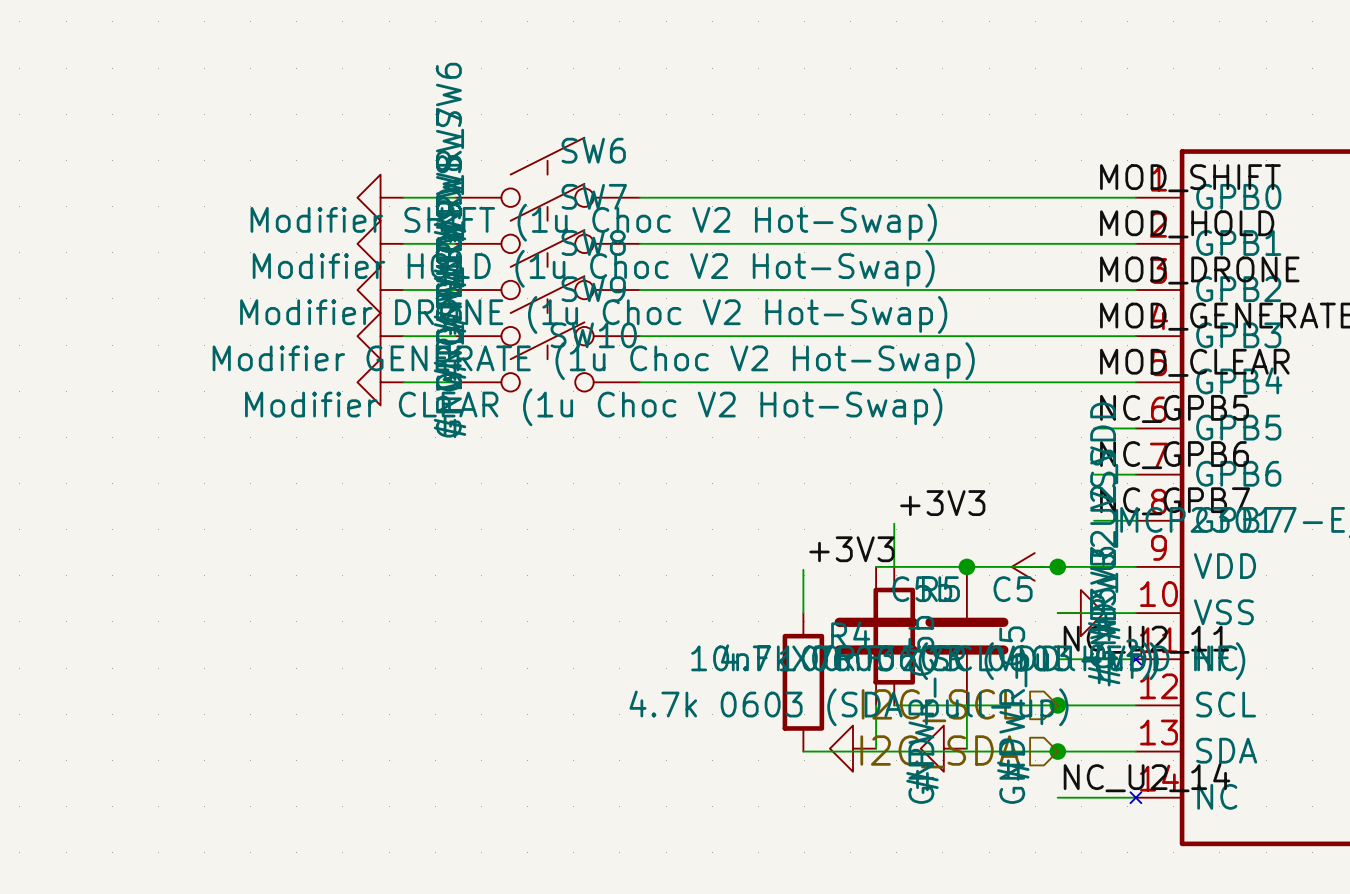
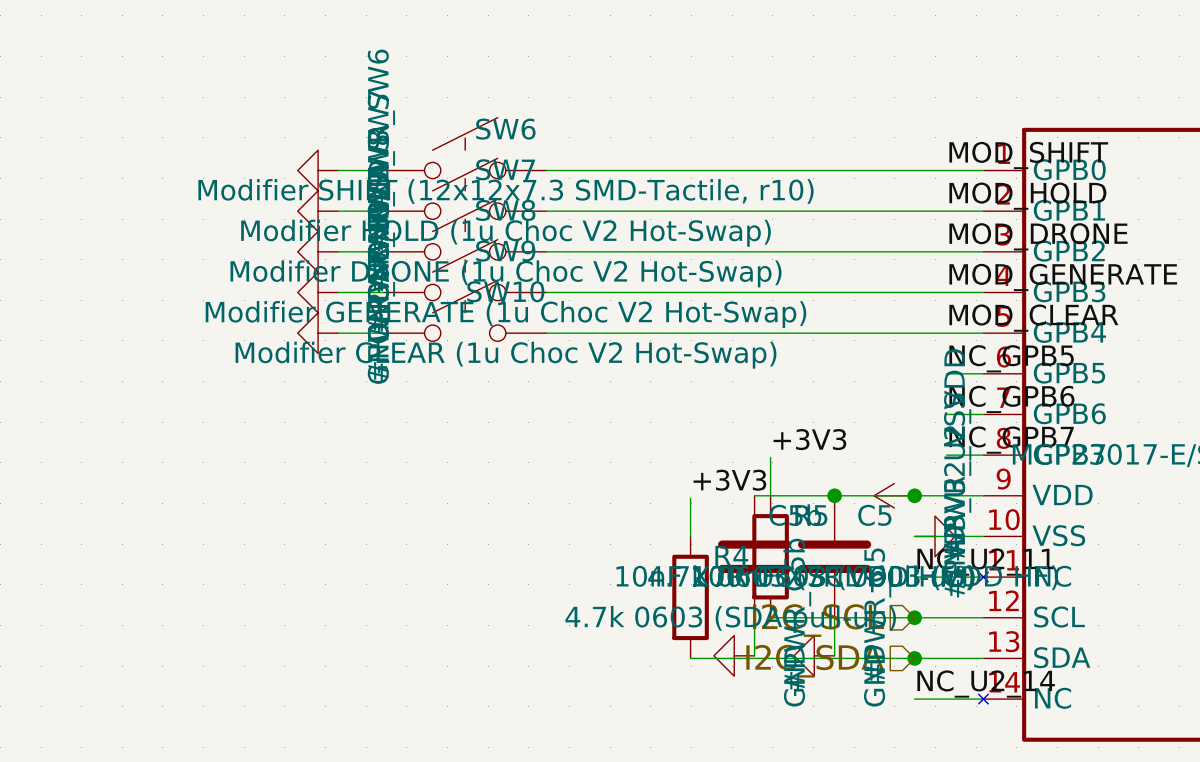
SW6 value: Modifier SHIFT (1u Choc V2 Hot-Swap) (593, 222) -> Modifier SHIFT (12x12x7.3 SMD-Tactile, r10) (506, 191)

